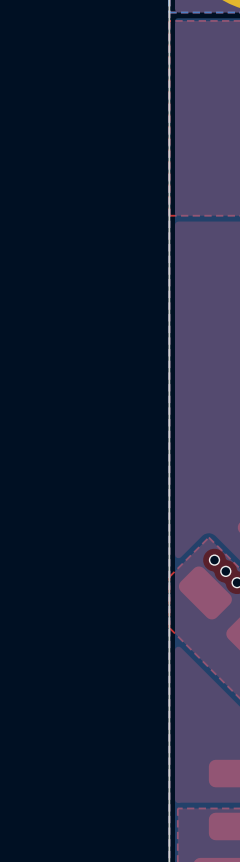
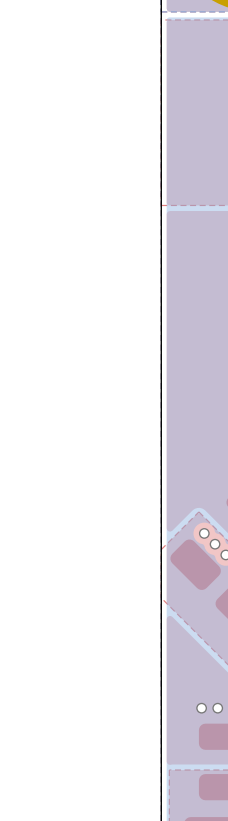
via: none -> (201, 708)
via: none -> (217, 708)

